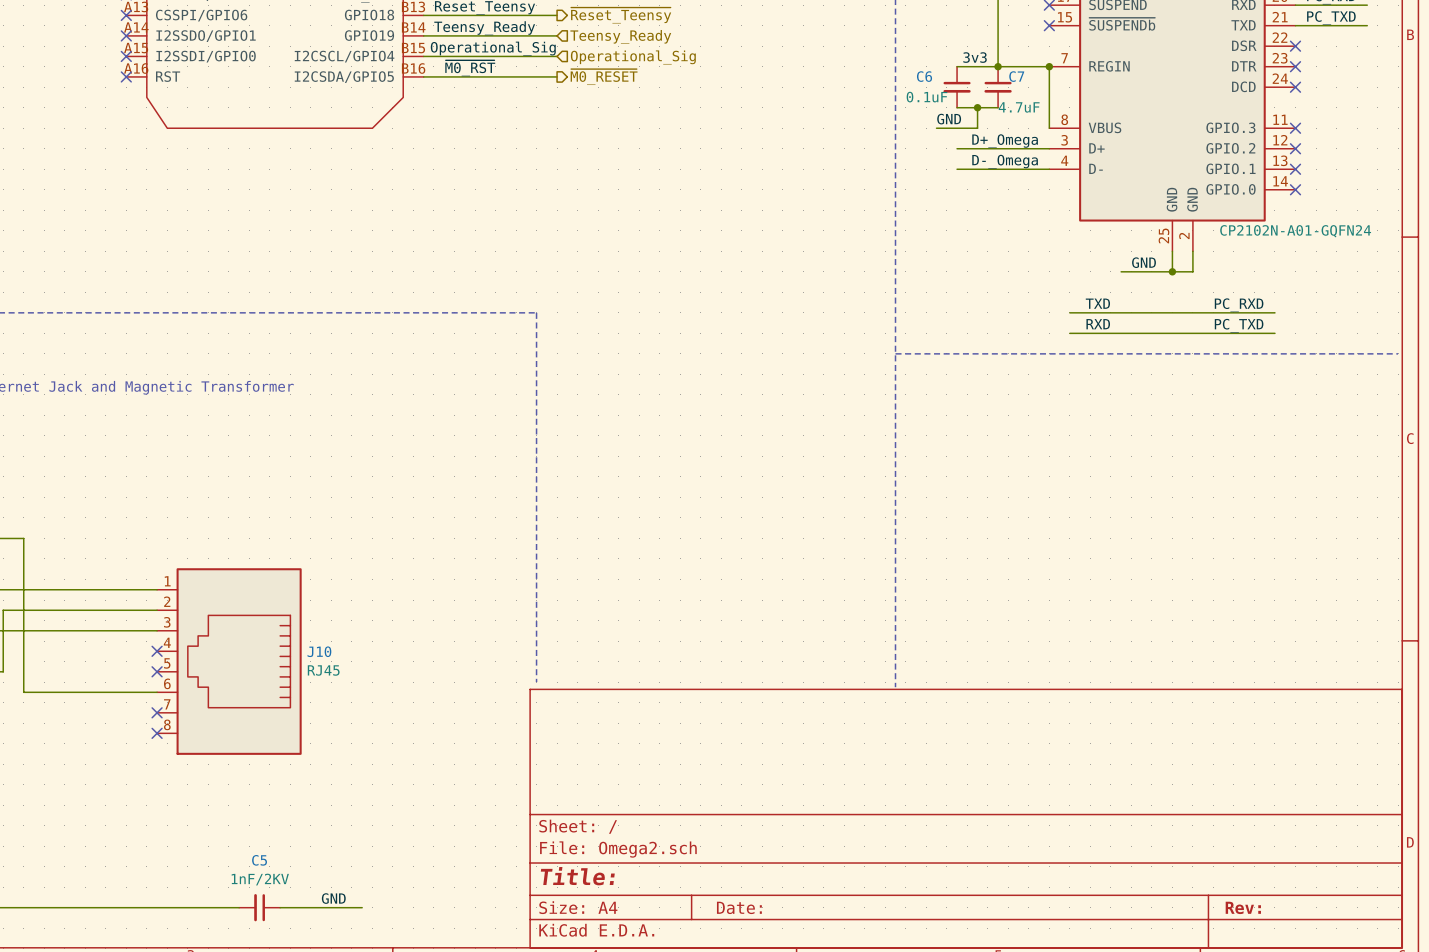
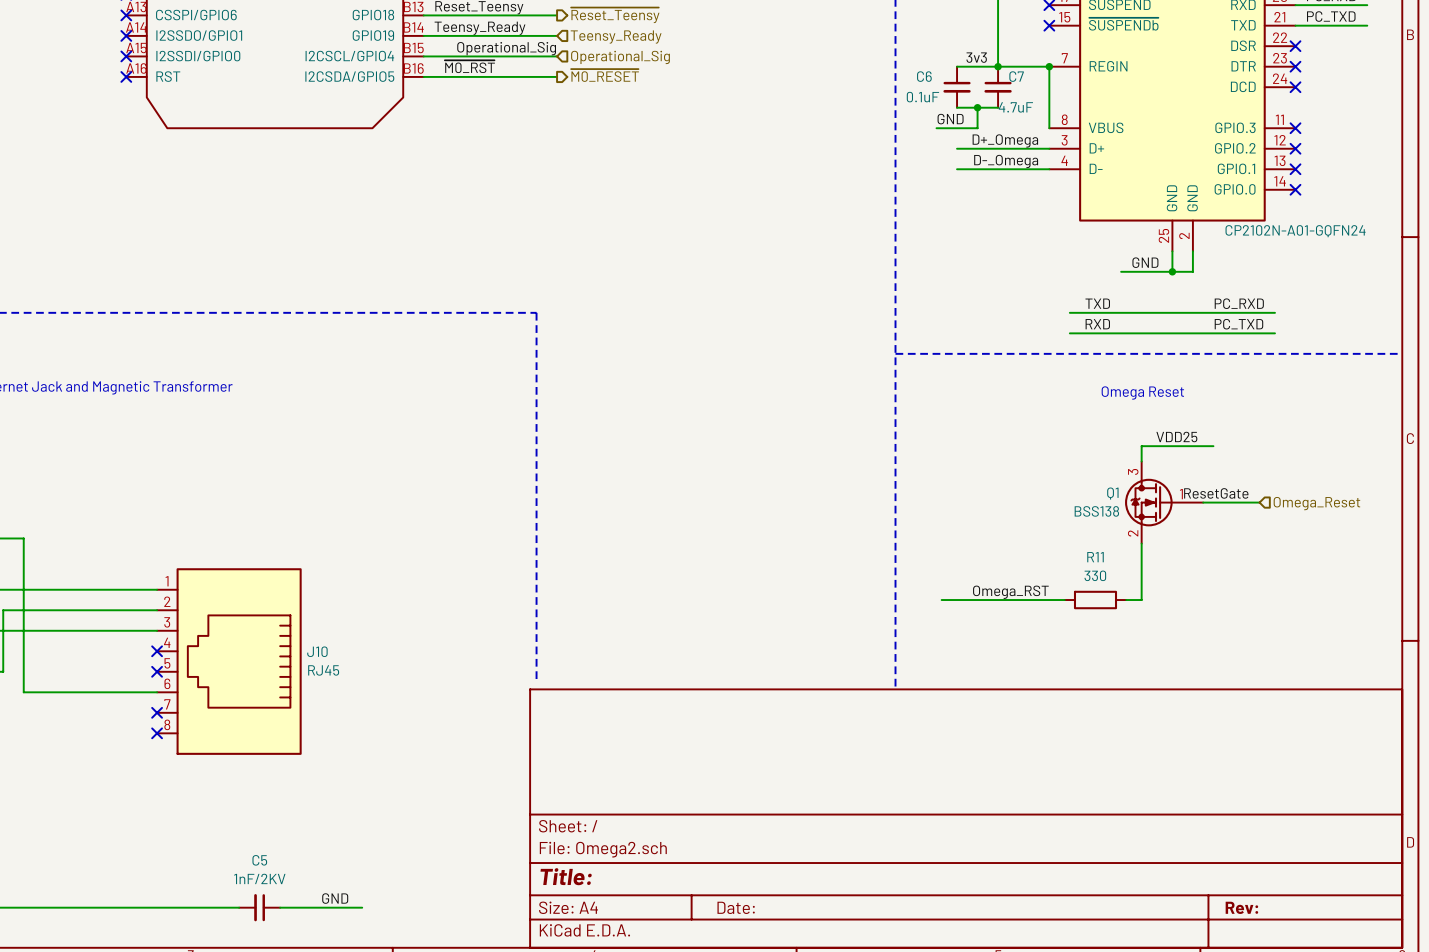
text: none -> Omega Reset (1142, 393)
label: none -> VDD25 (1176, 437)
wire: none -> (1213, 446) (1141, 446) (1141, 461)
label: none -> ResetGate (1216, 493)
Q1: none -> BSS138 (1164, 502)
wire: none -> (1203, 502) (1259, 502)
hierarchical label: none -> Omega_Reset (1316, 503)
wire: none -> (1141, 543) (1141, 600) (1126, 600)
label: none -> Omega_RST (1010, 592)
wire: none -> (941, 600) (1064, 600)
R11: none -> 330 (1095, 600)

